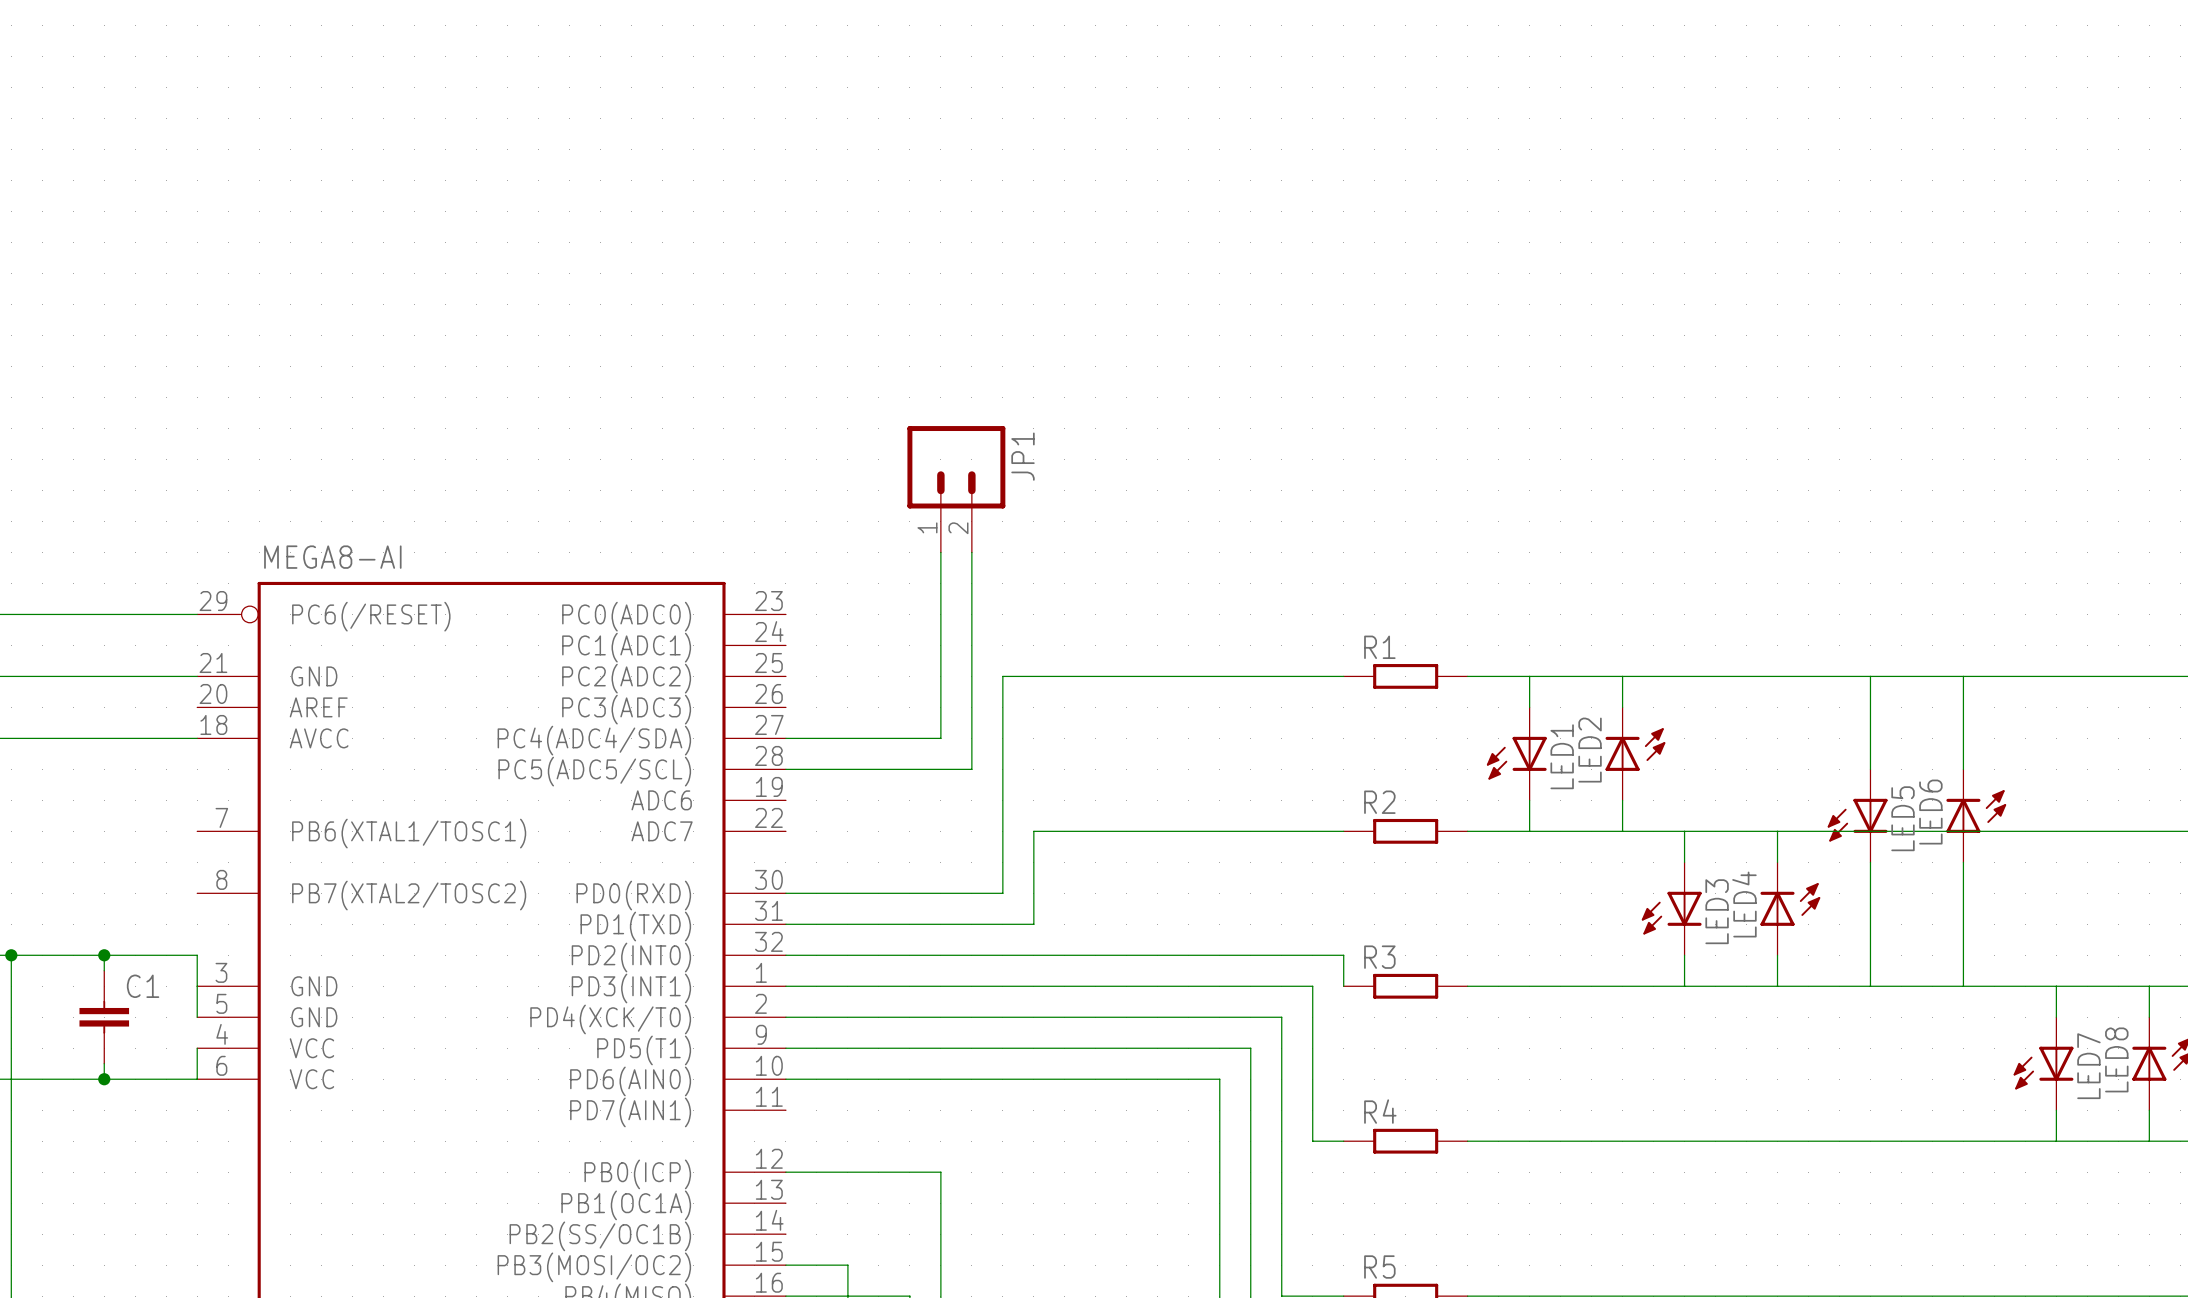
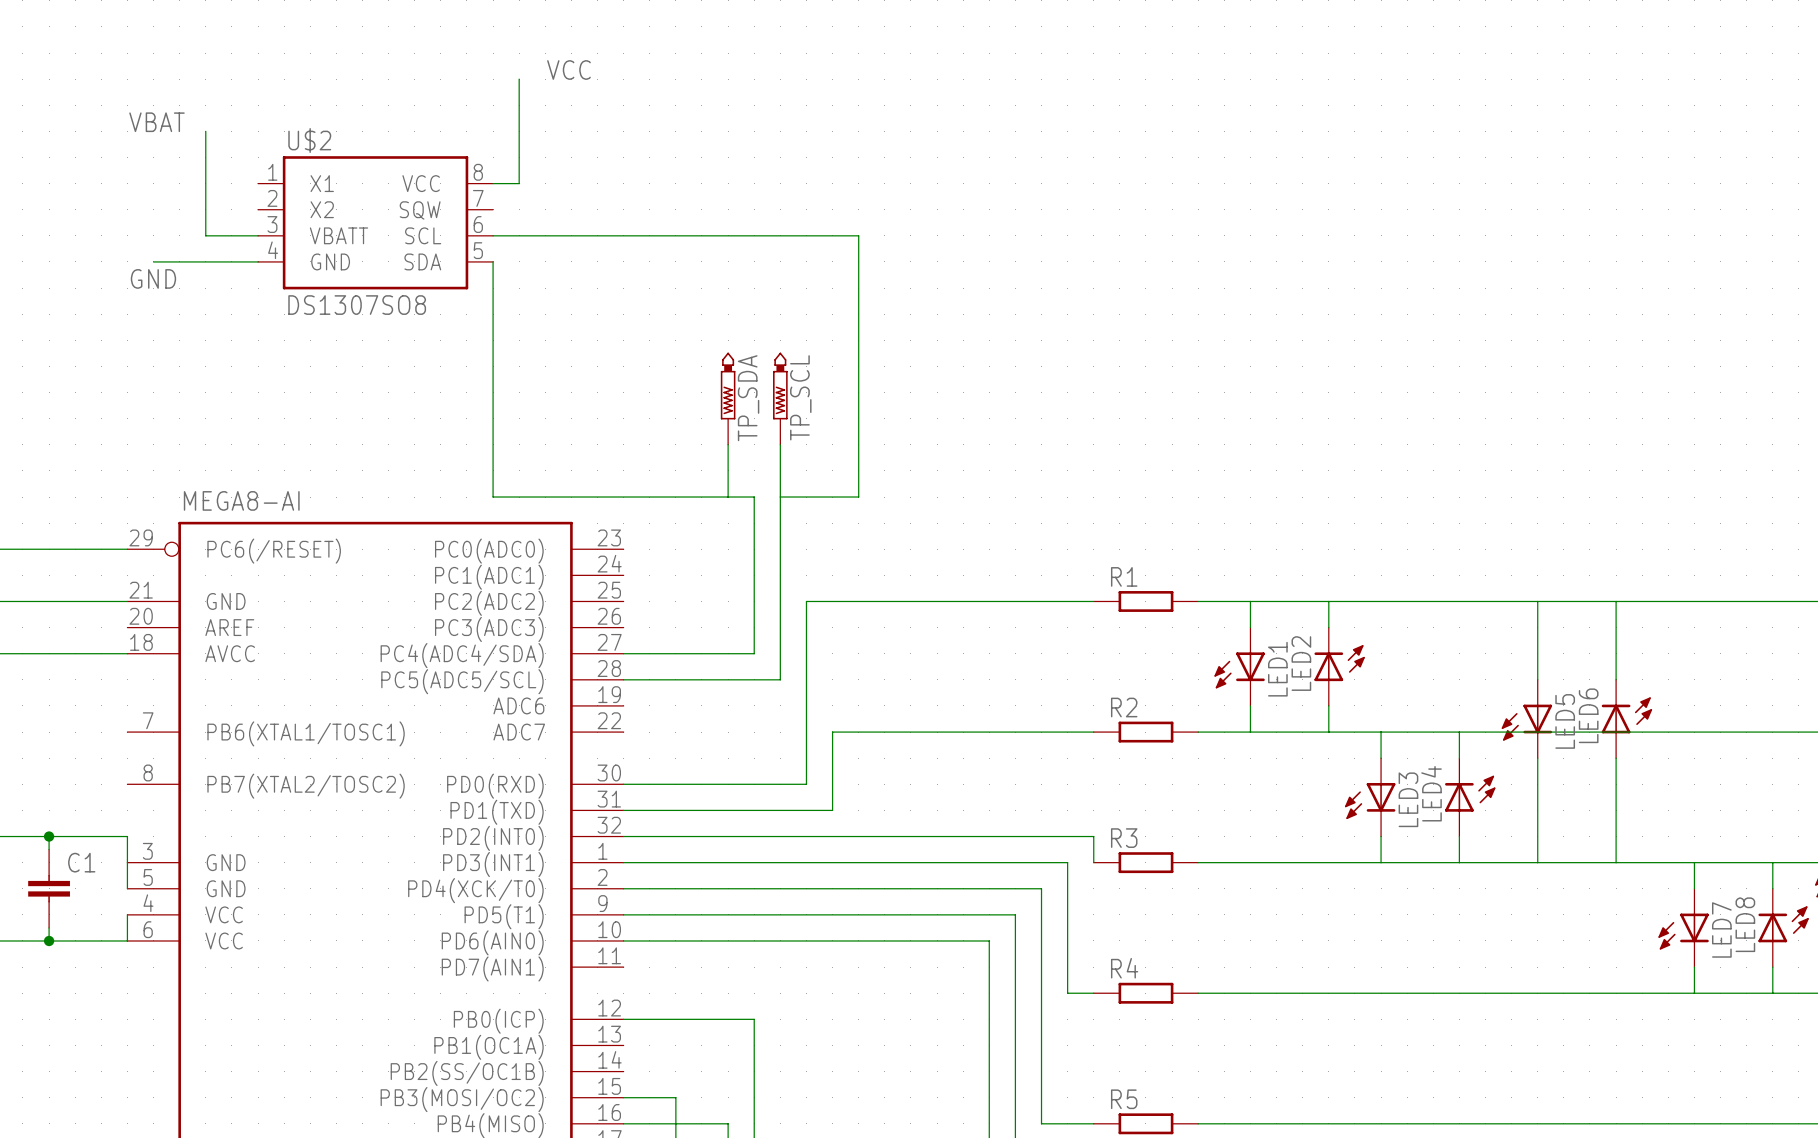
label: none -> VCC (568, 69)
wire: none -> (519, 79) (519, 183) (493, 183)
label: none -> VBAT (156, 122)
wire: none -> (205, 131) (205, 235) (258, 235)
U$2: none -> DS1307SO8 (375, 222)
wire: none -> (493, 235) (858, 235) (858, 497) (780, 497) (780, 444)
wire: none -> (153, 261) (258, 261)
wire: none -> (493, 261) (493, 497) (754, 497)
label: none -> GND (153, 278)
TP_SDA: none -> (728, 398)
TP_SCL: none -> (780, 398)
JP1: (956, 489) -> none
wire: none -> (728, 444) (728, 497)

